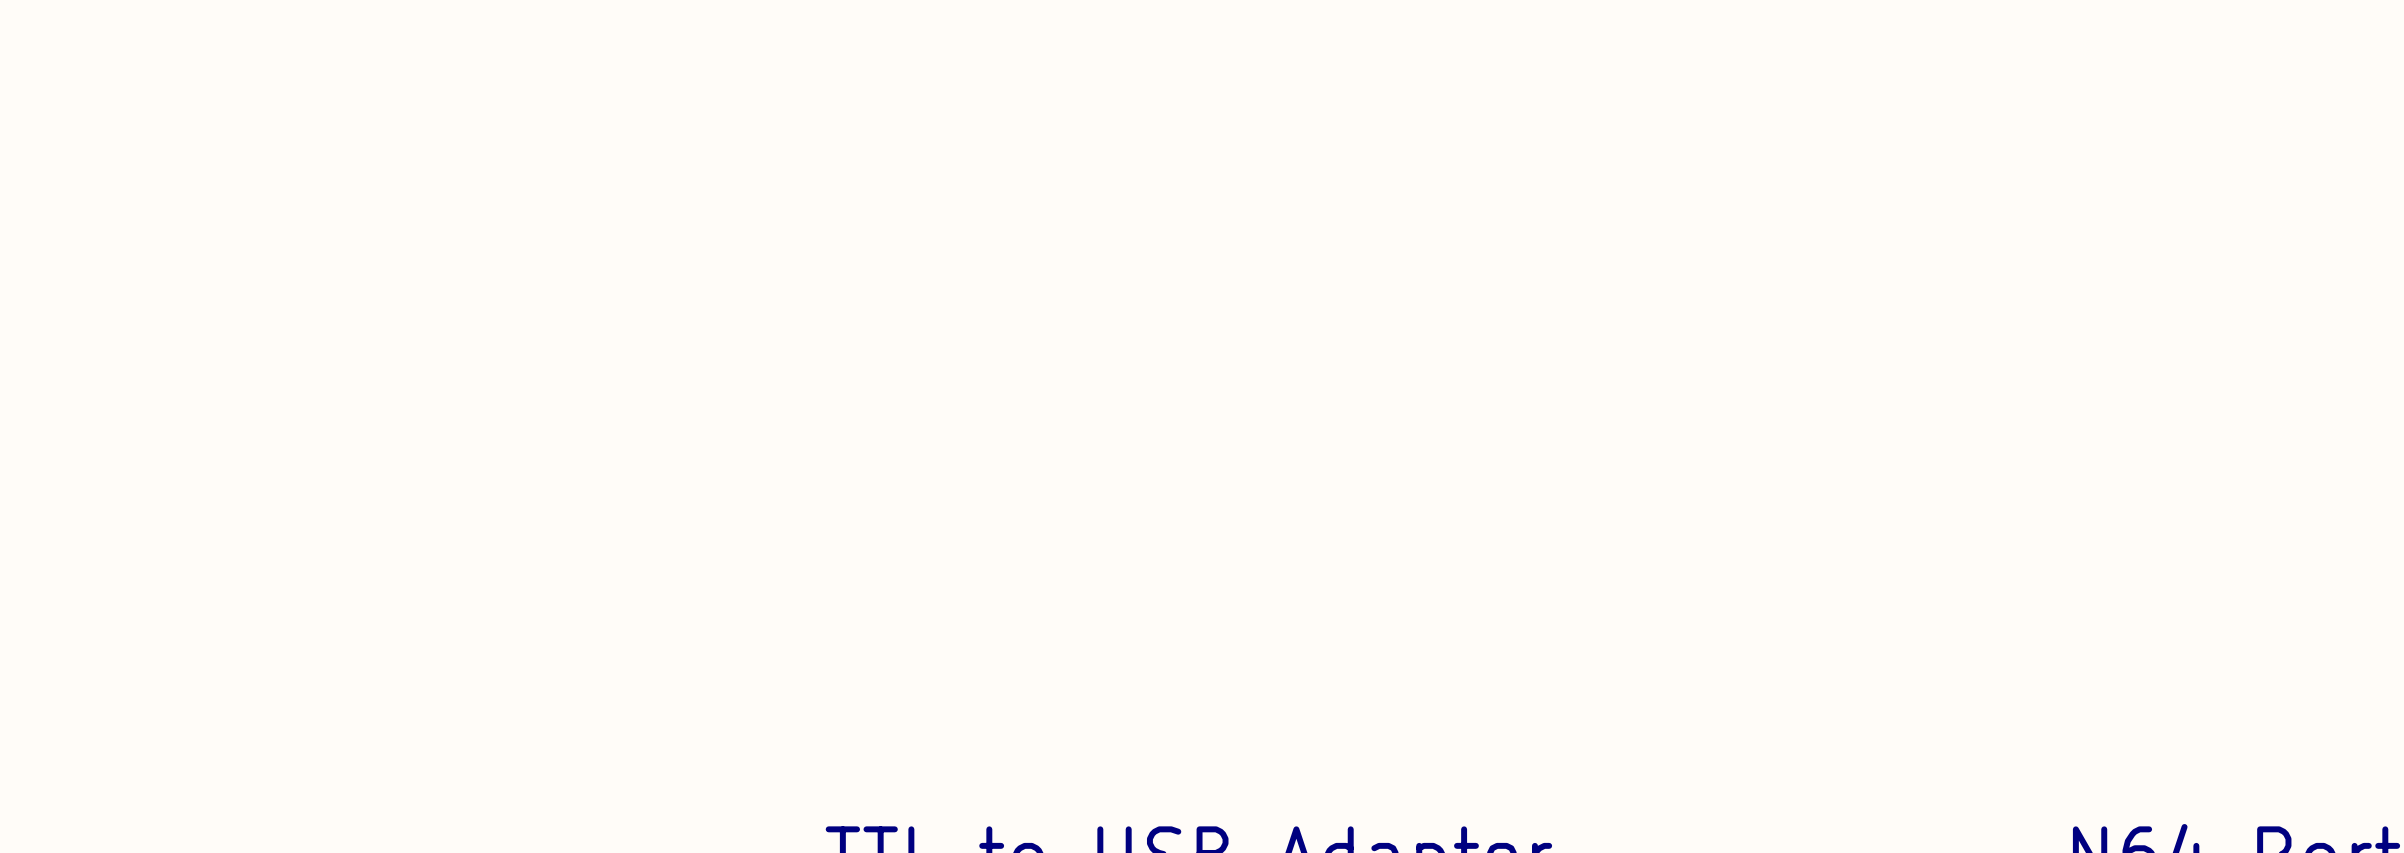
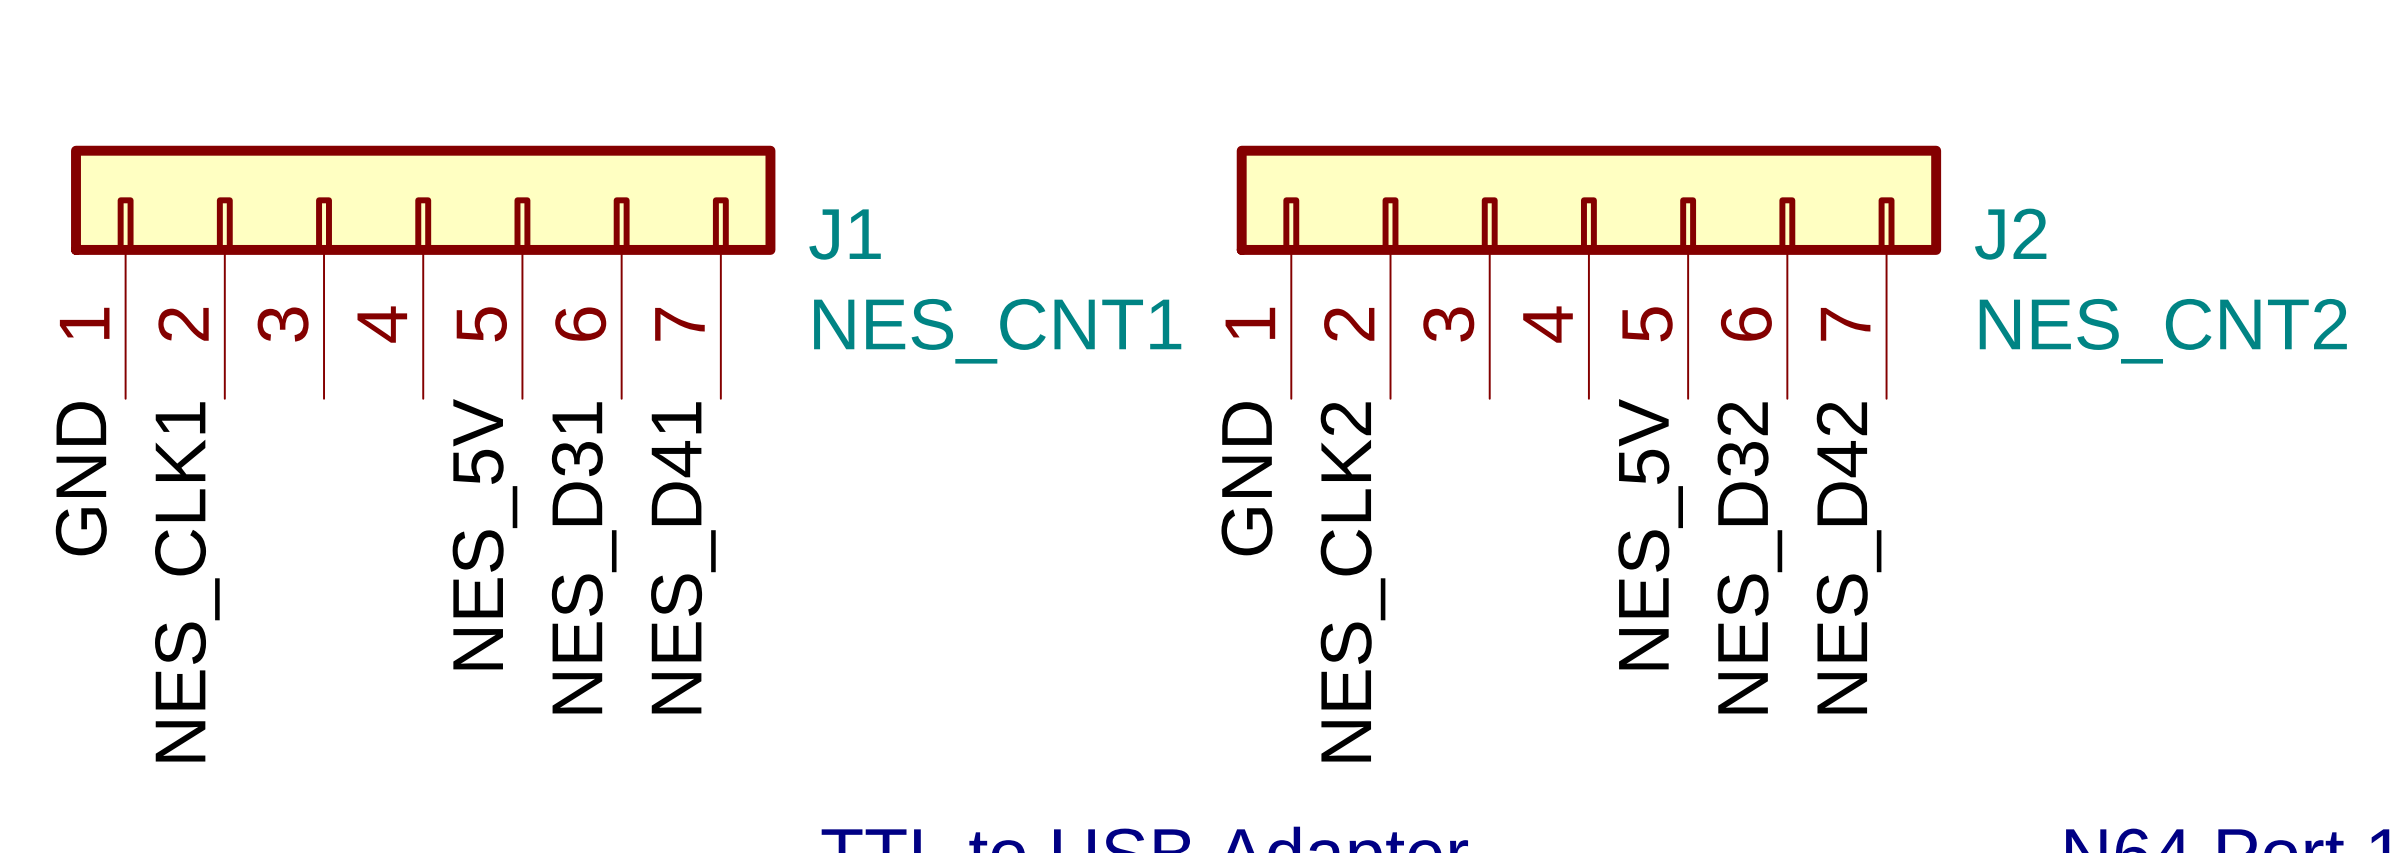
J1: none -> NES_CNT1 (423, 272)
J2: none -> NES_CNT2 (1588, 272)
label: none -> GND (81, 478)
label: none -> GND (1247, 478)
label: none -> NES_5V (484, 534)
label: none -> NES_5V (1650, 534)
label: none -> NES_D31 (584, 557)
label: none -> NES_D41 (683, 557)
label: none -> NES_D32 (1749, 557)
label: none -> NES_D42 (1849, 557)
label: none -> NES_CLK1 (187, 581)
label: none -> NES_CLK2 (1353, 581)

